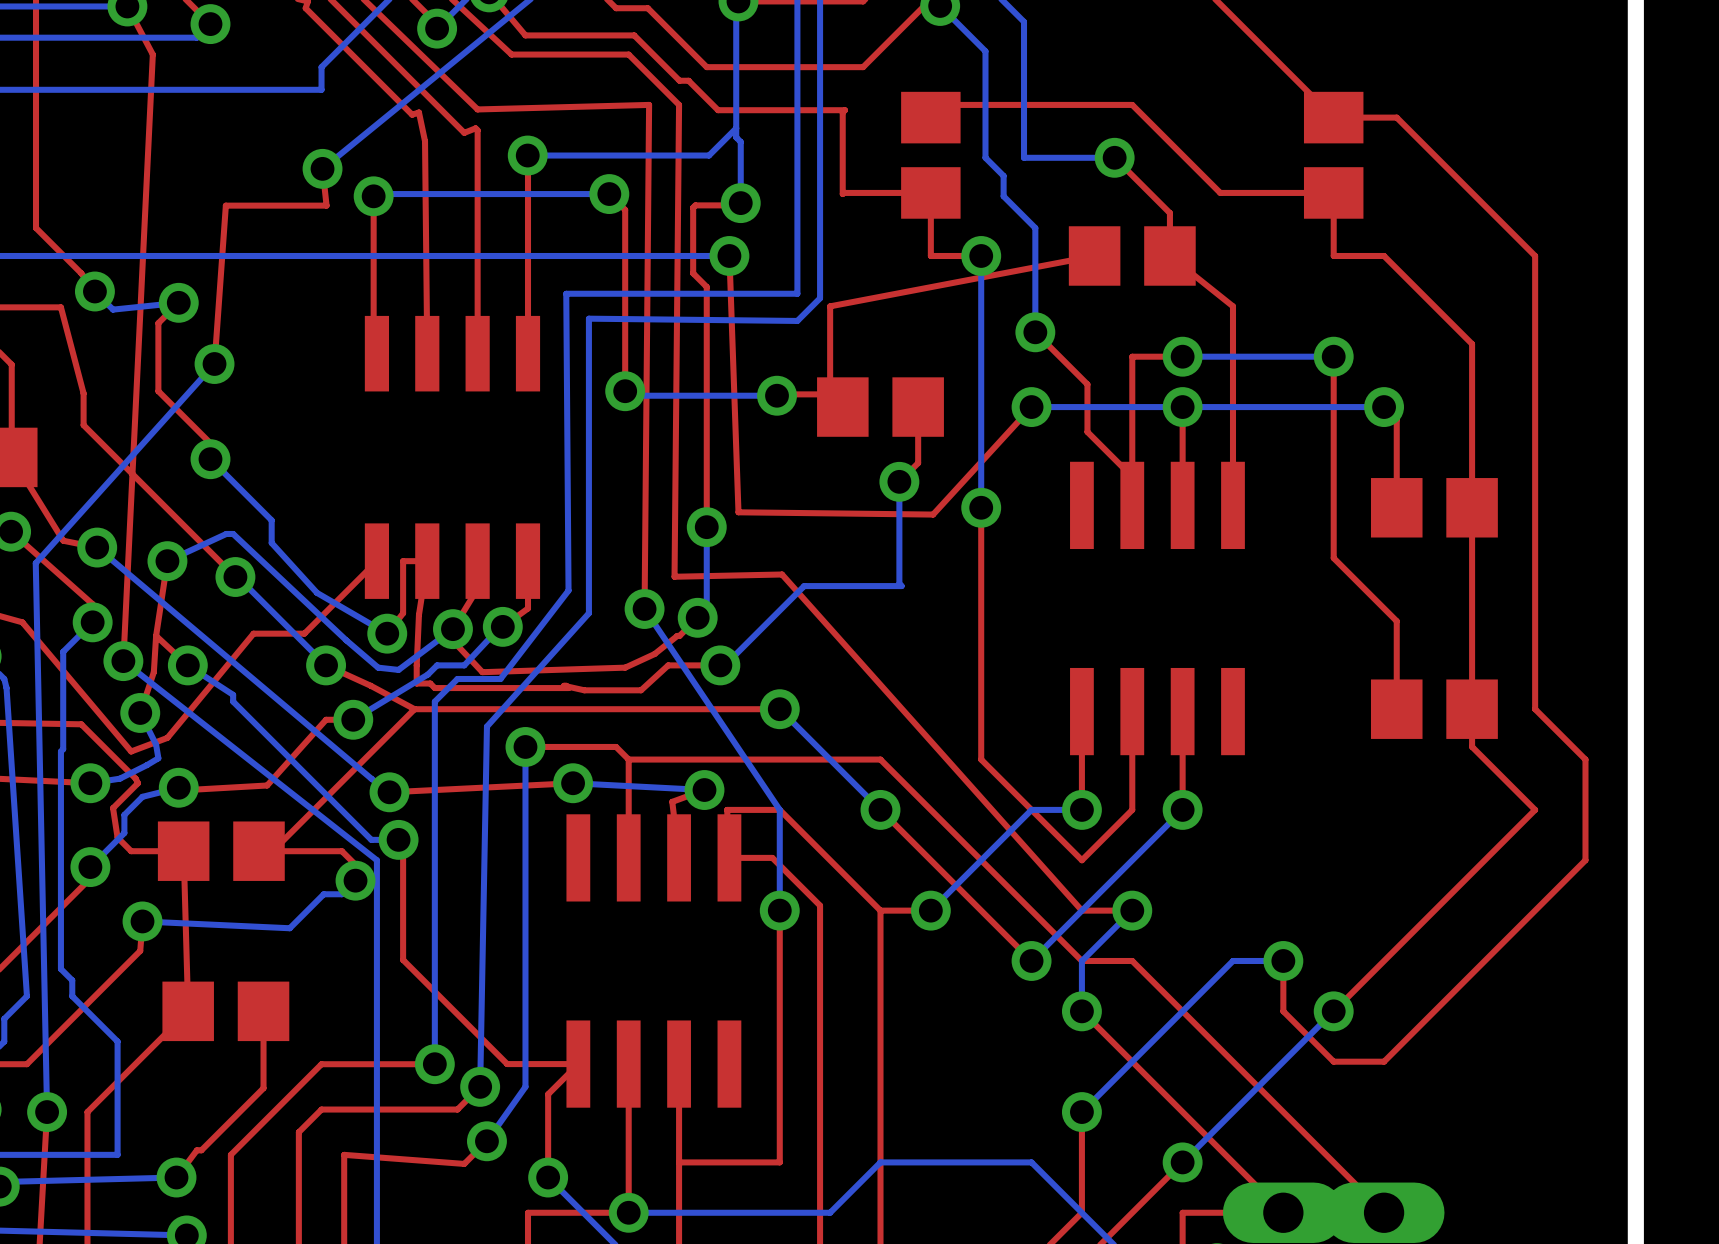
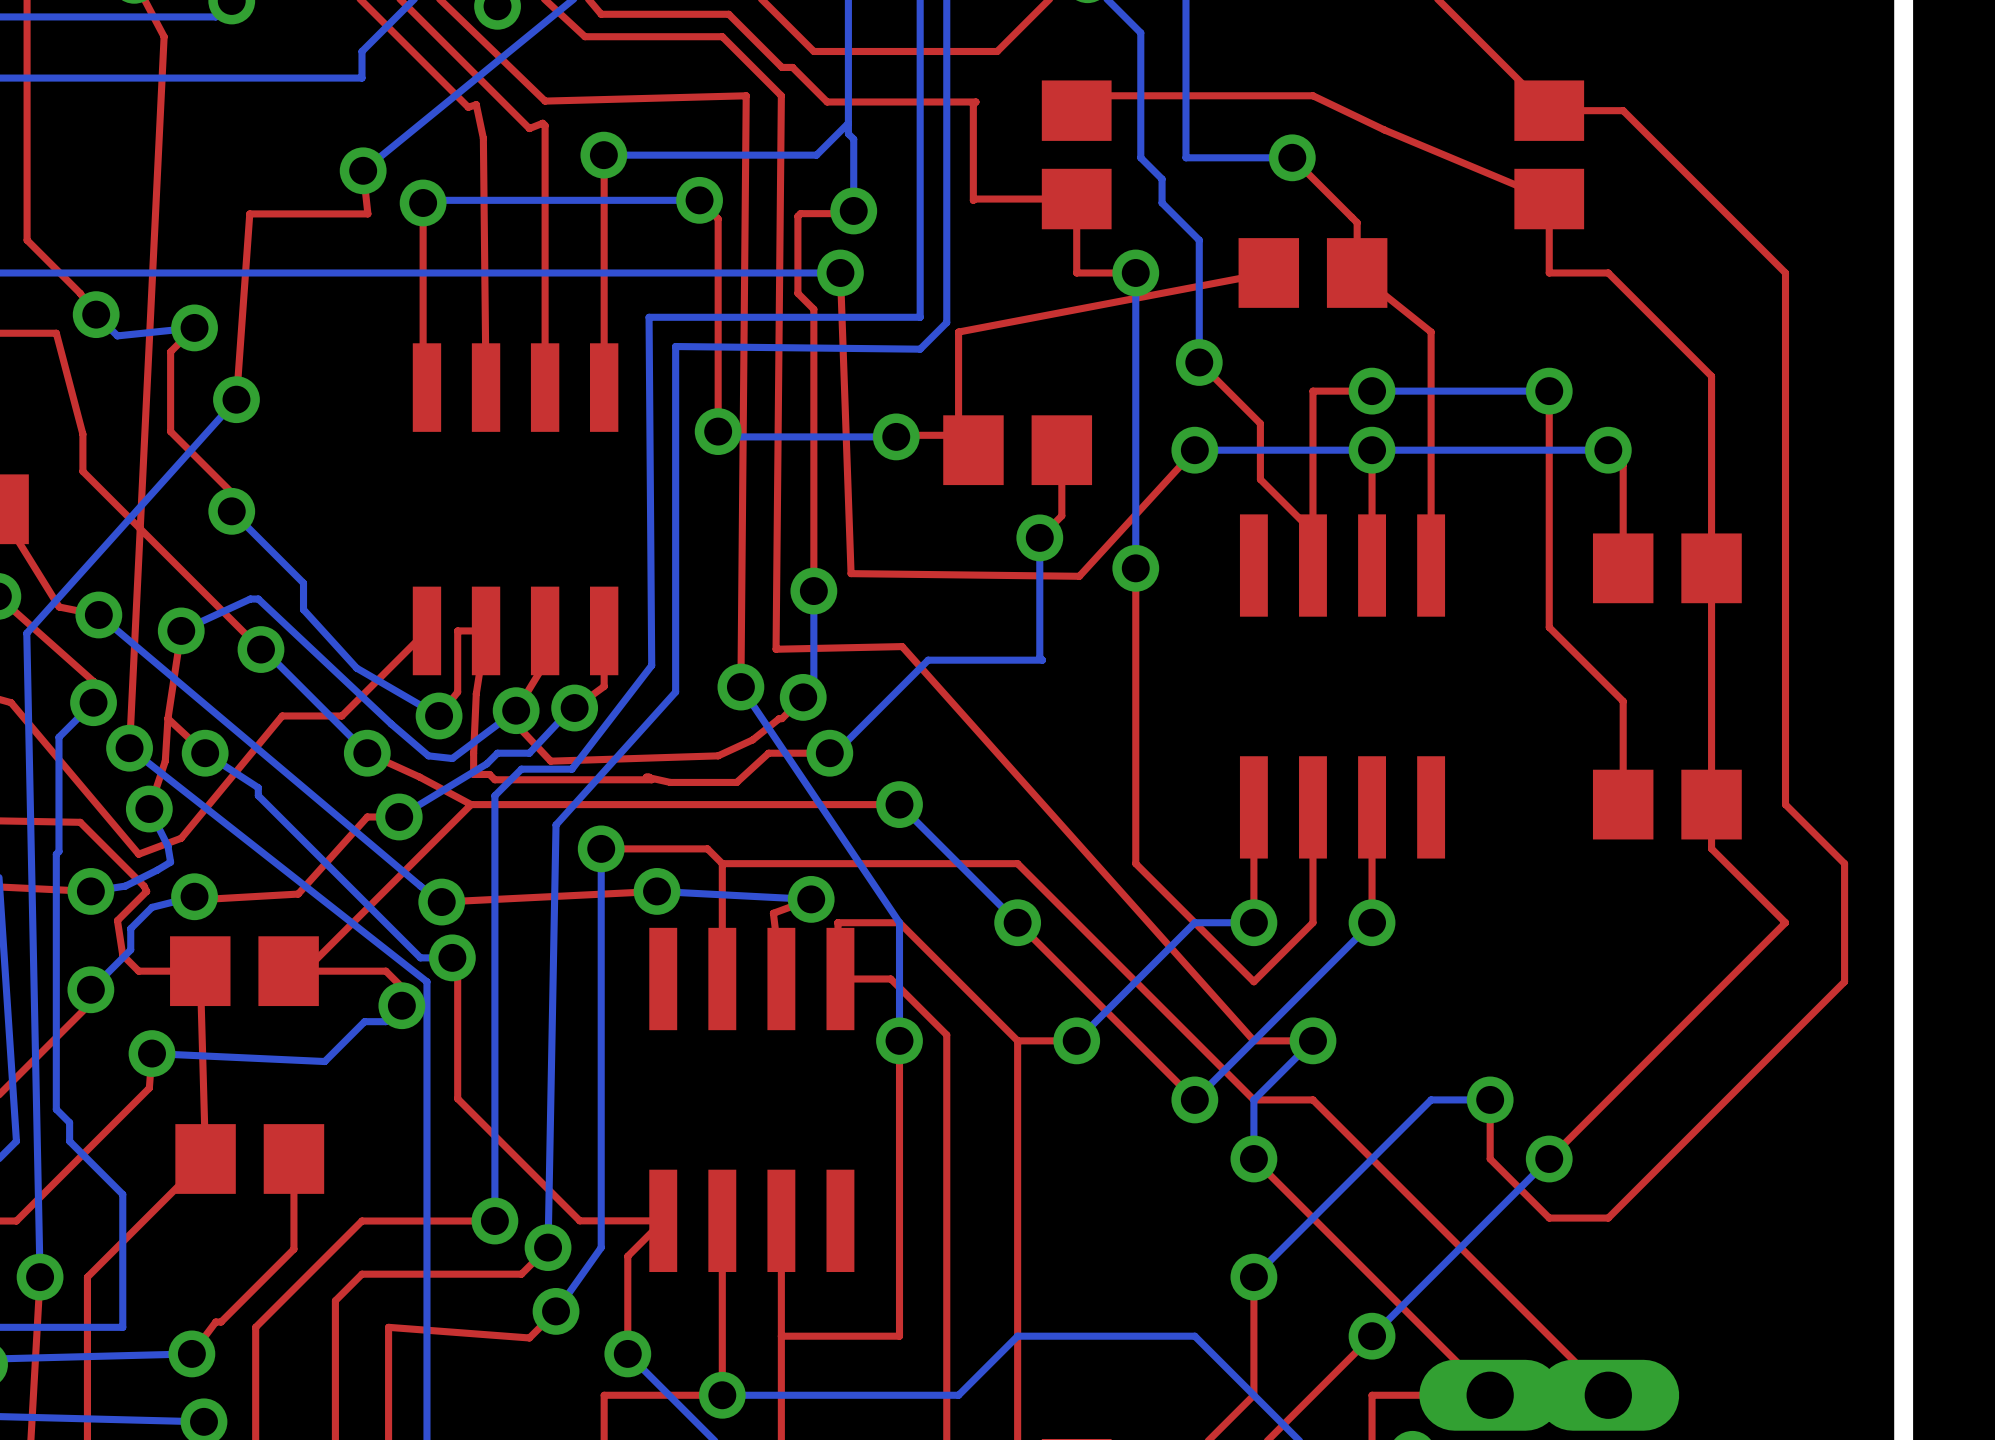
top track: (1132, 104) (1220, 192) (1333, 192) -> (1312, 95) (1384, 129) (1549, 199)

